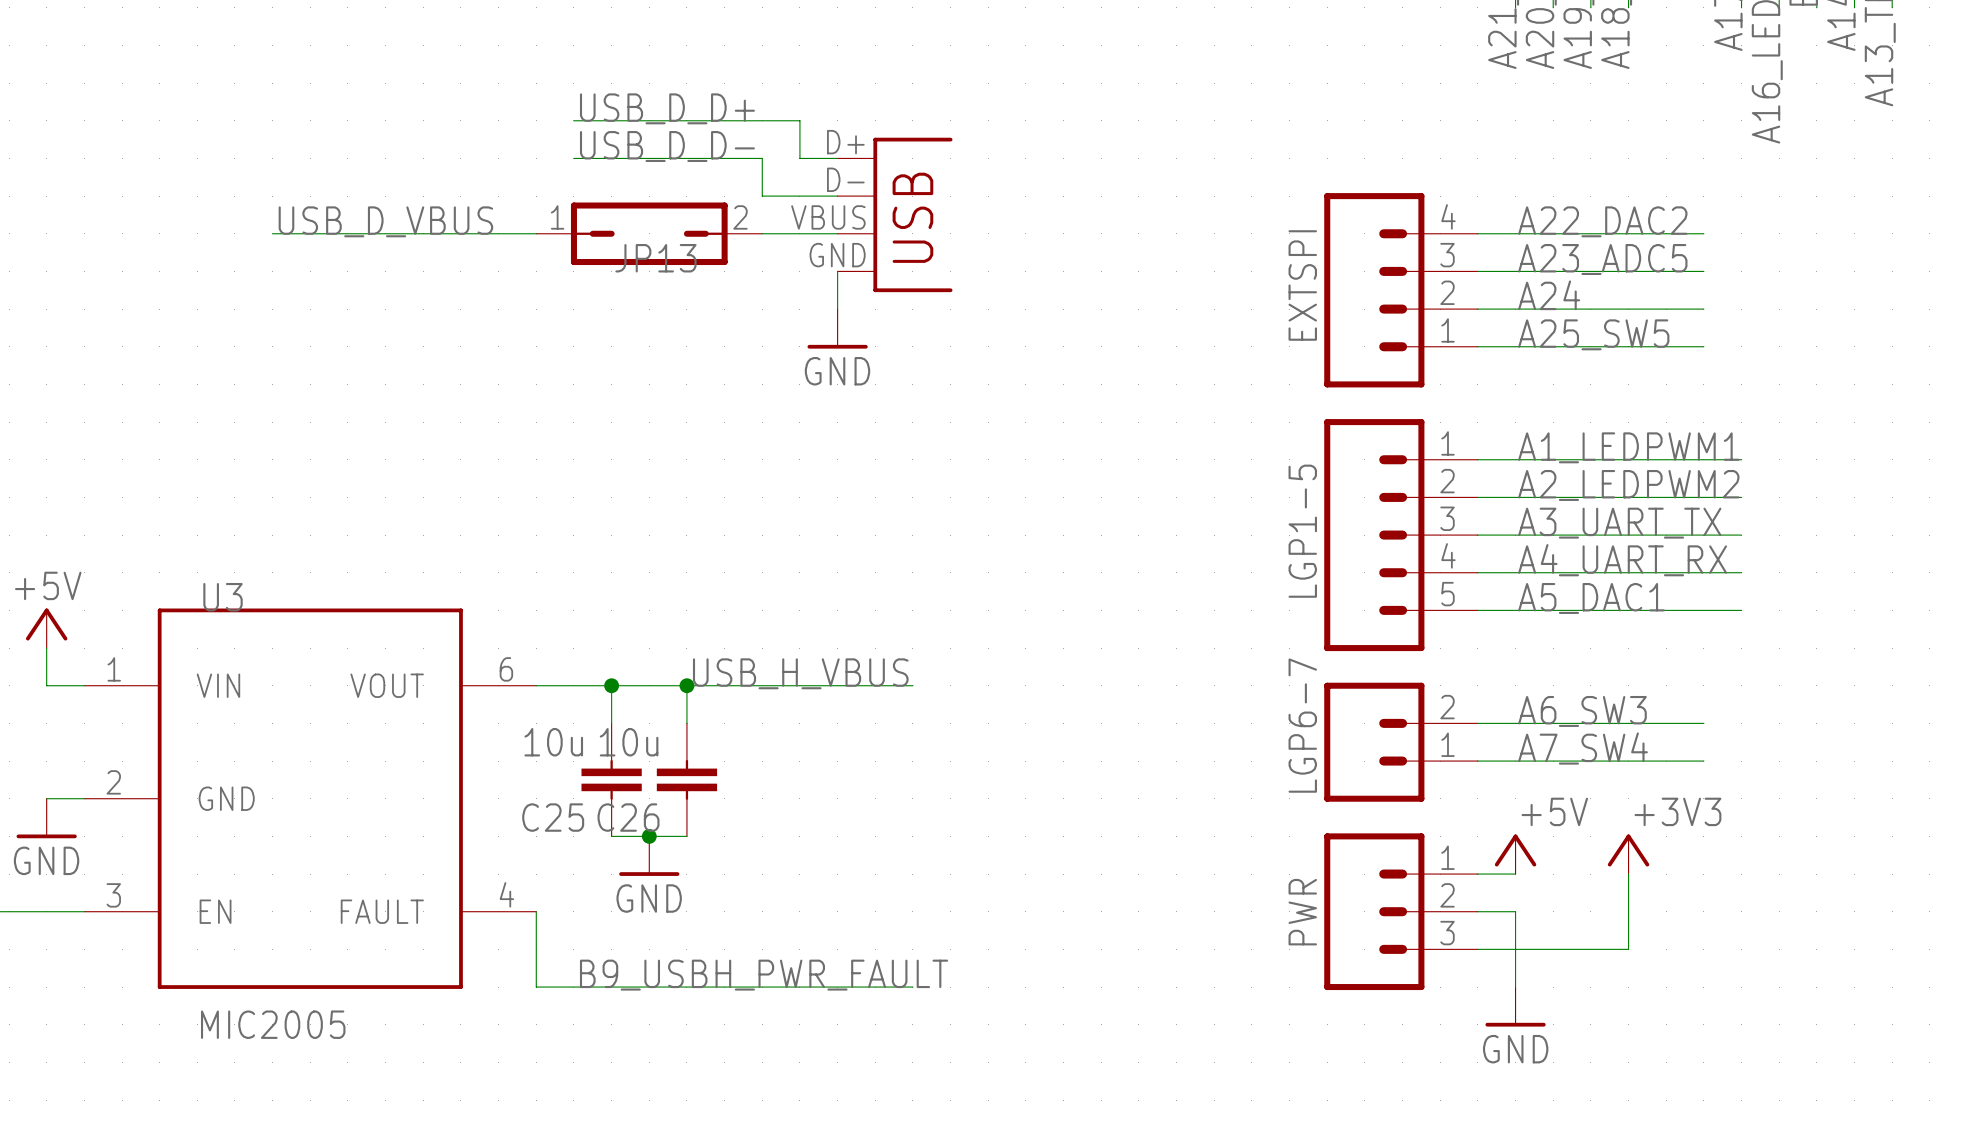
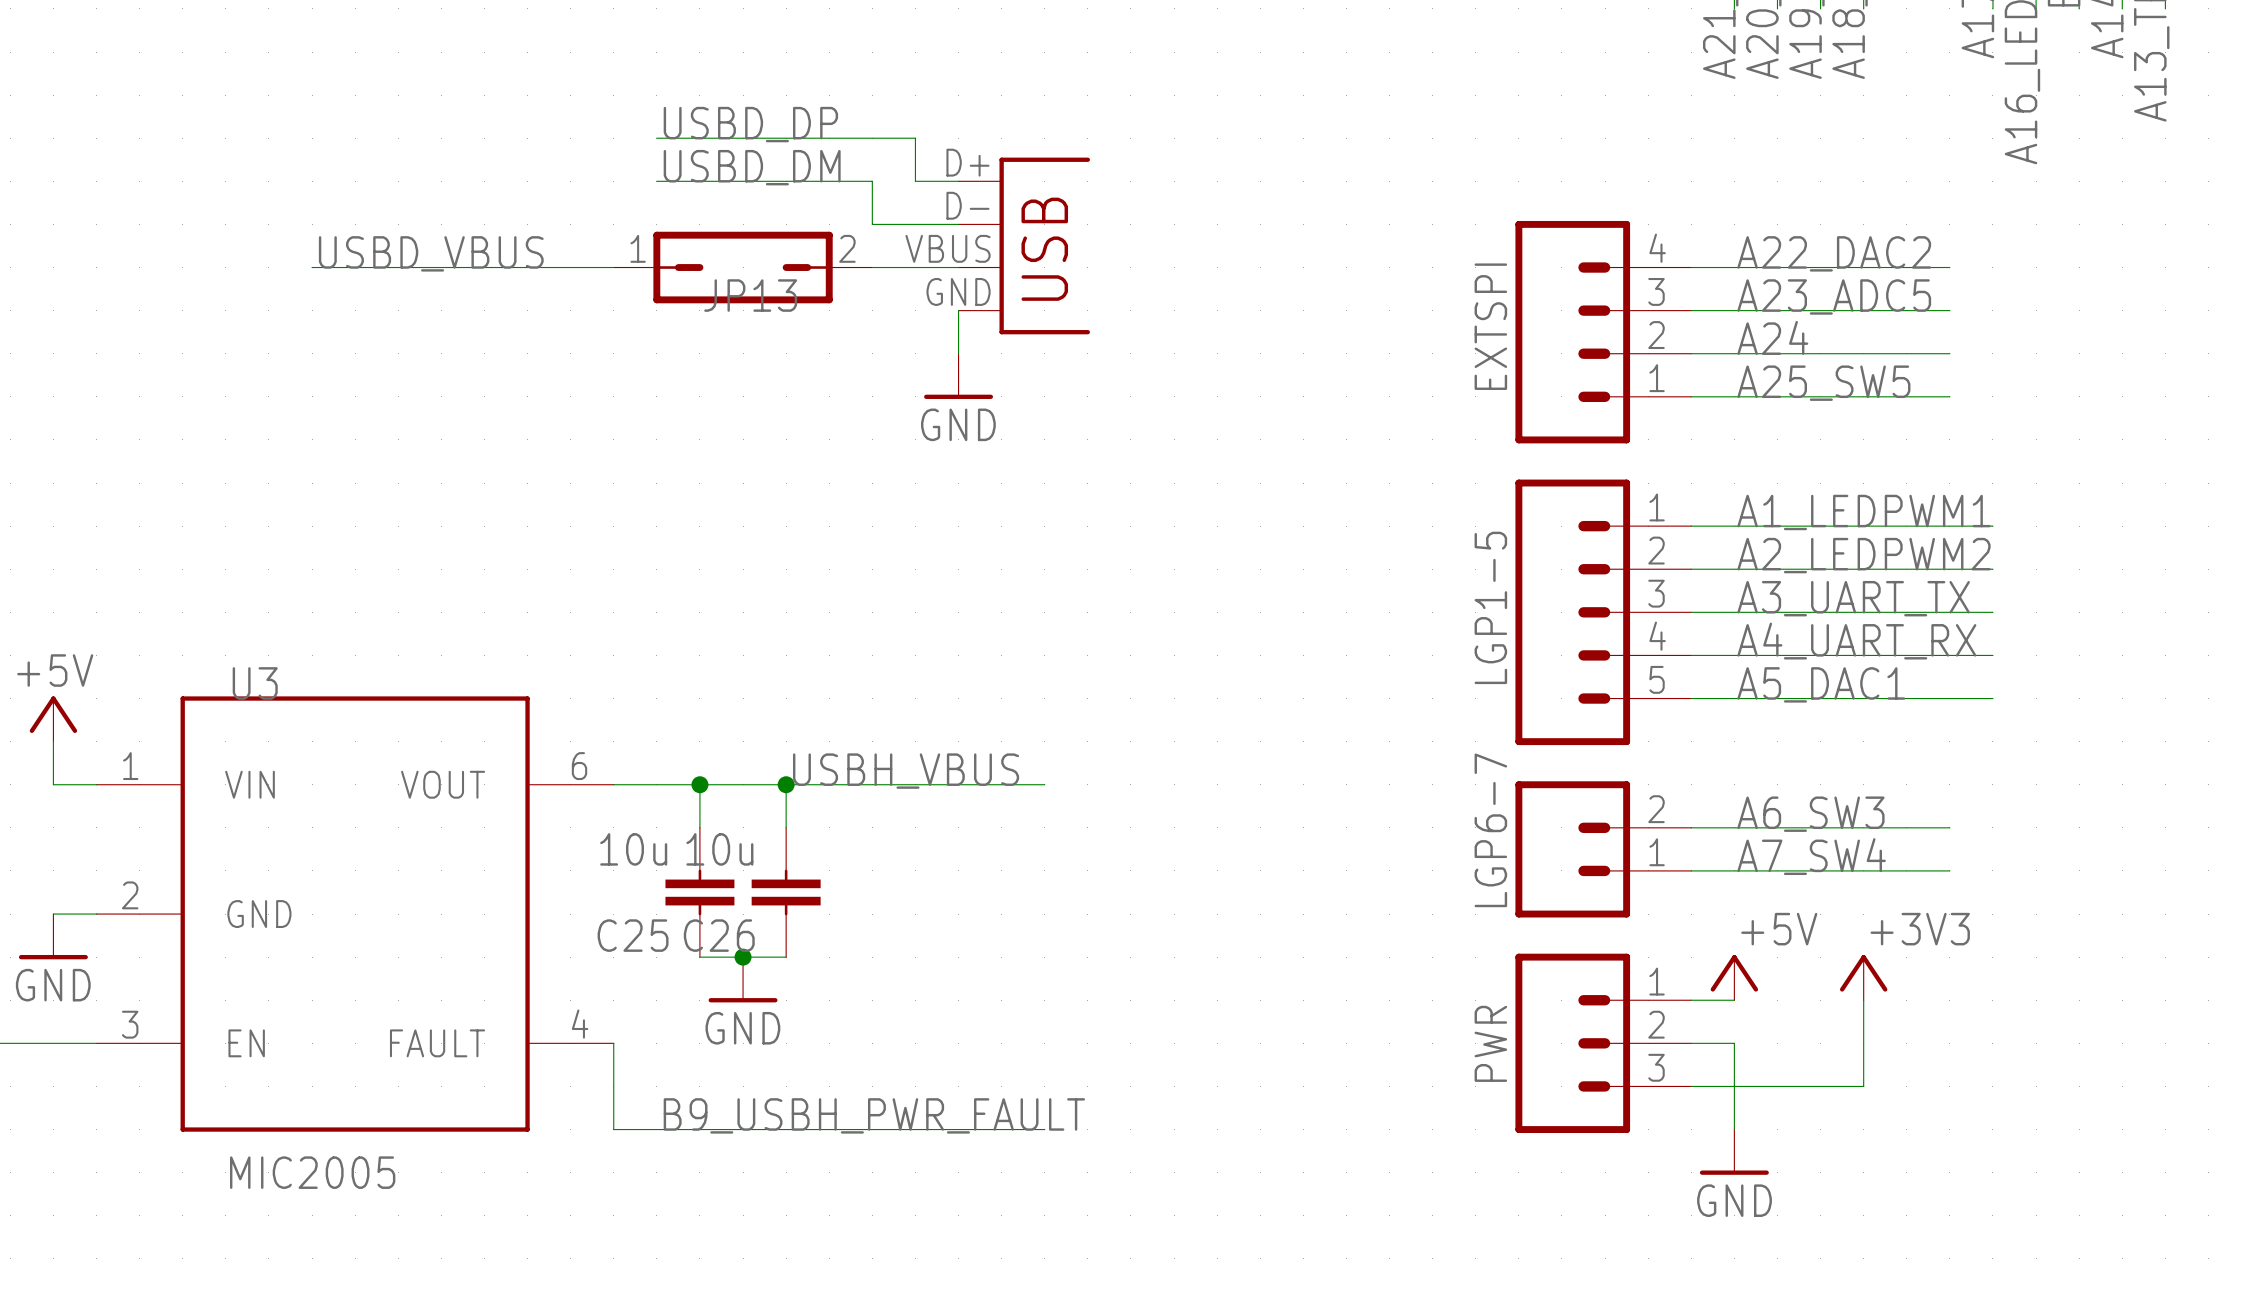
label: USB_D_D+ (667, 108) -> USBD_DP (750, 124)
label: USB_D_D- (667, 146) -> USBD_DM (752, 167)
label: USB_D_VBUS (385, 221) -> USBD_VBUS (431, 253)
label: USB_H_VBUS (800, 673) -> USBH_VBUS (906, 771)

